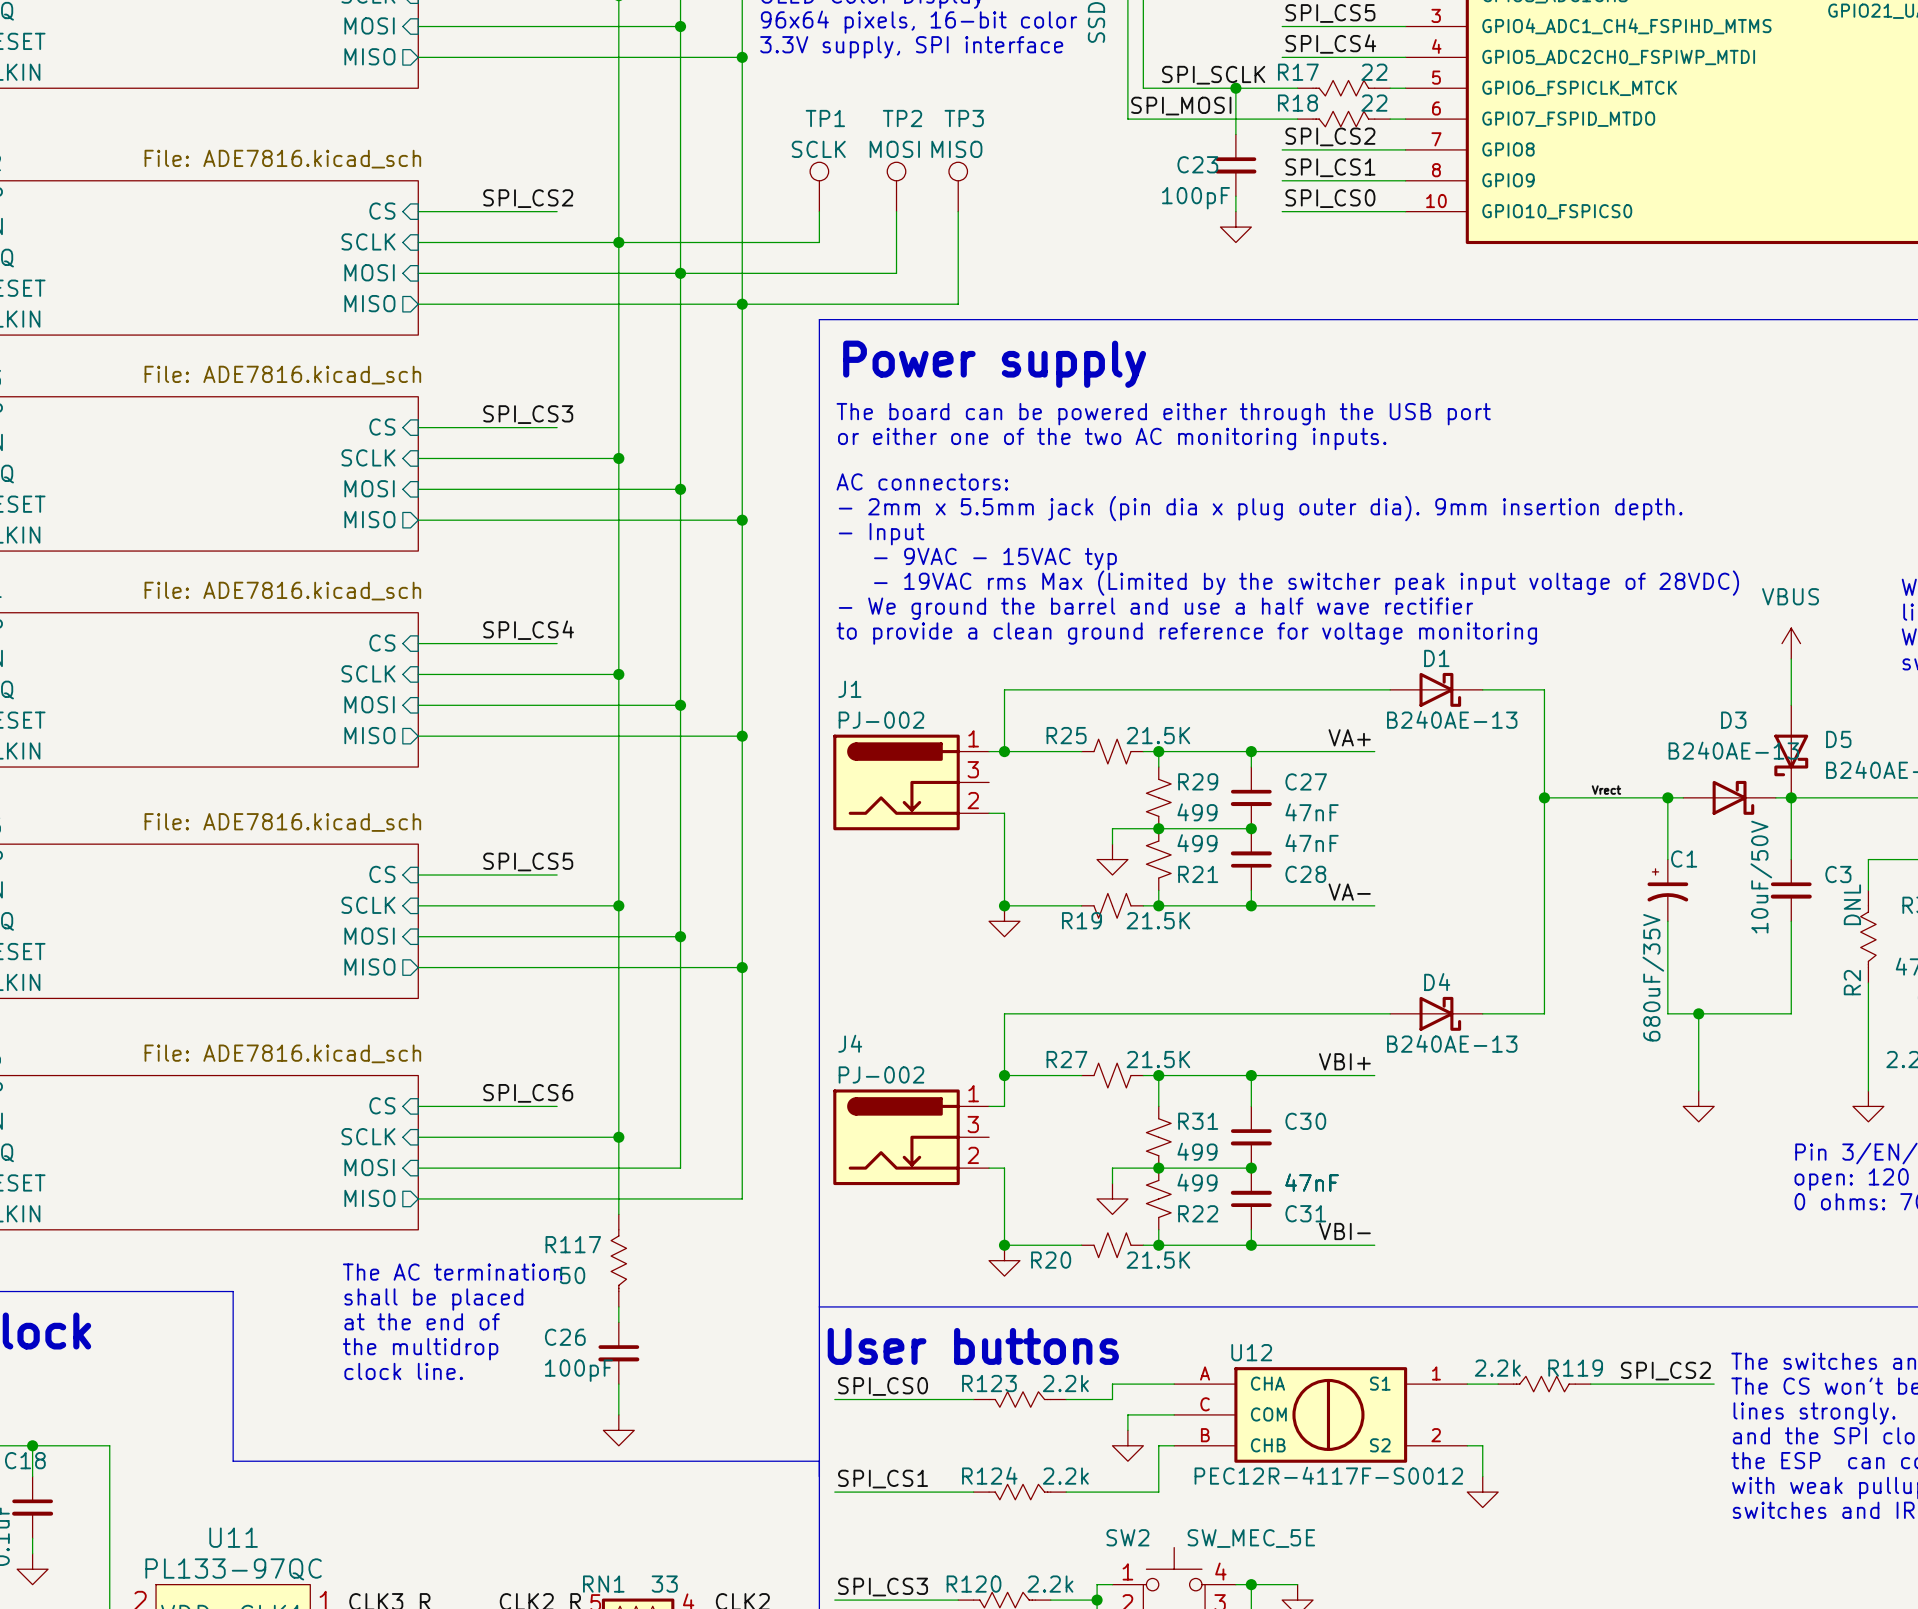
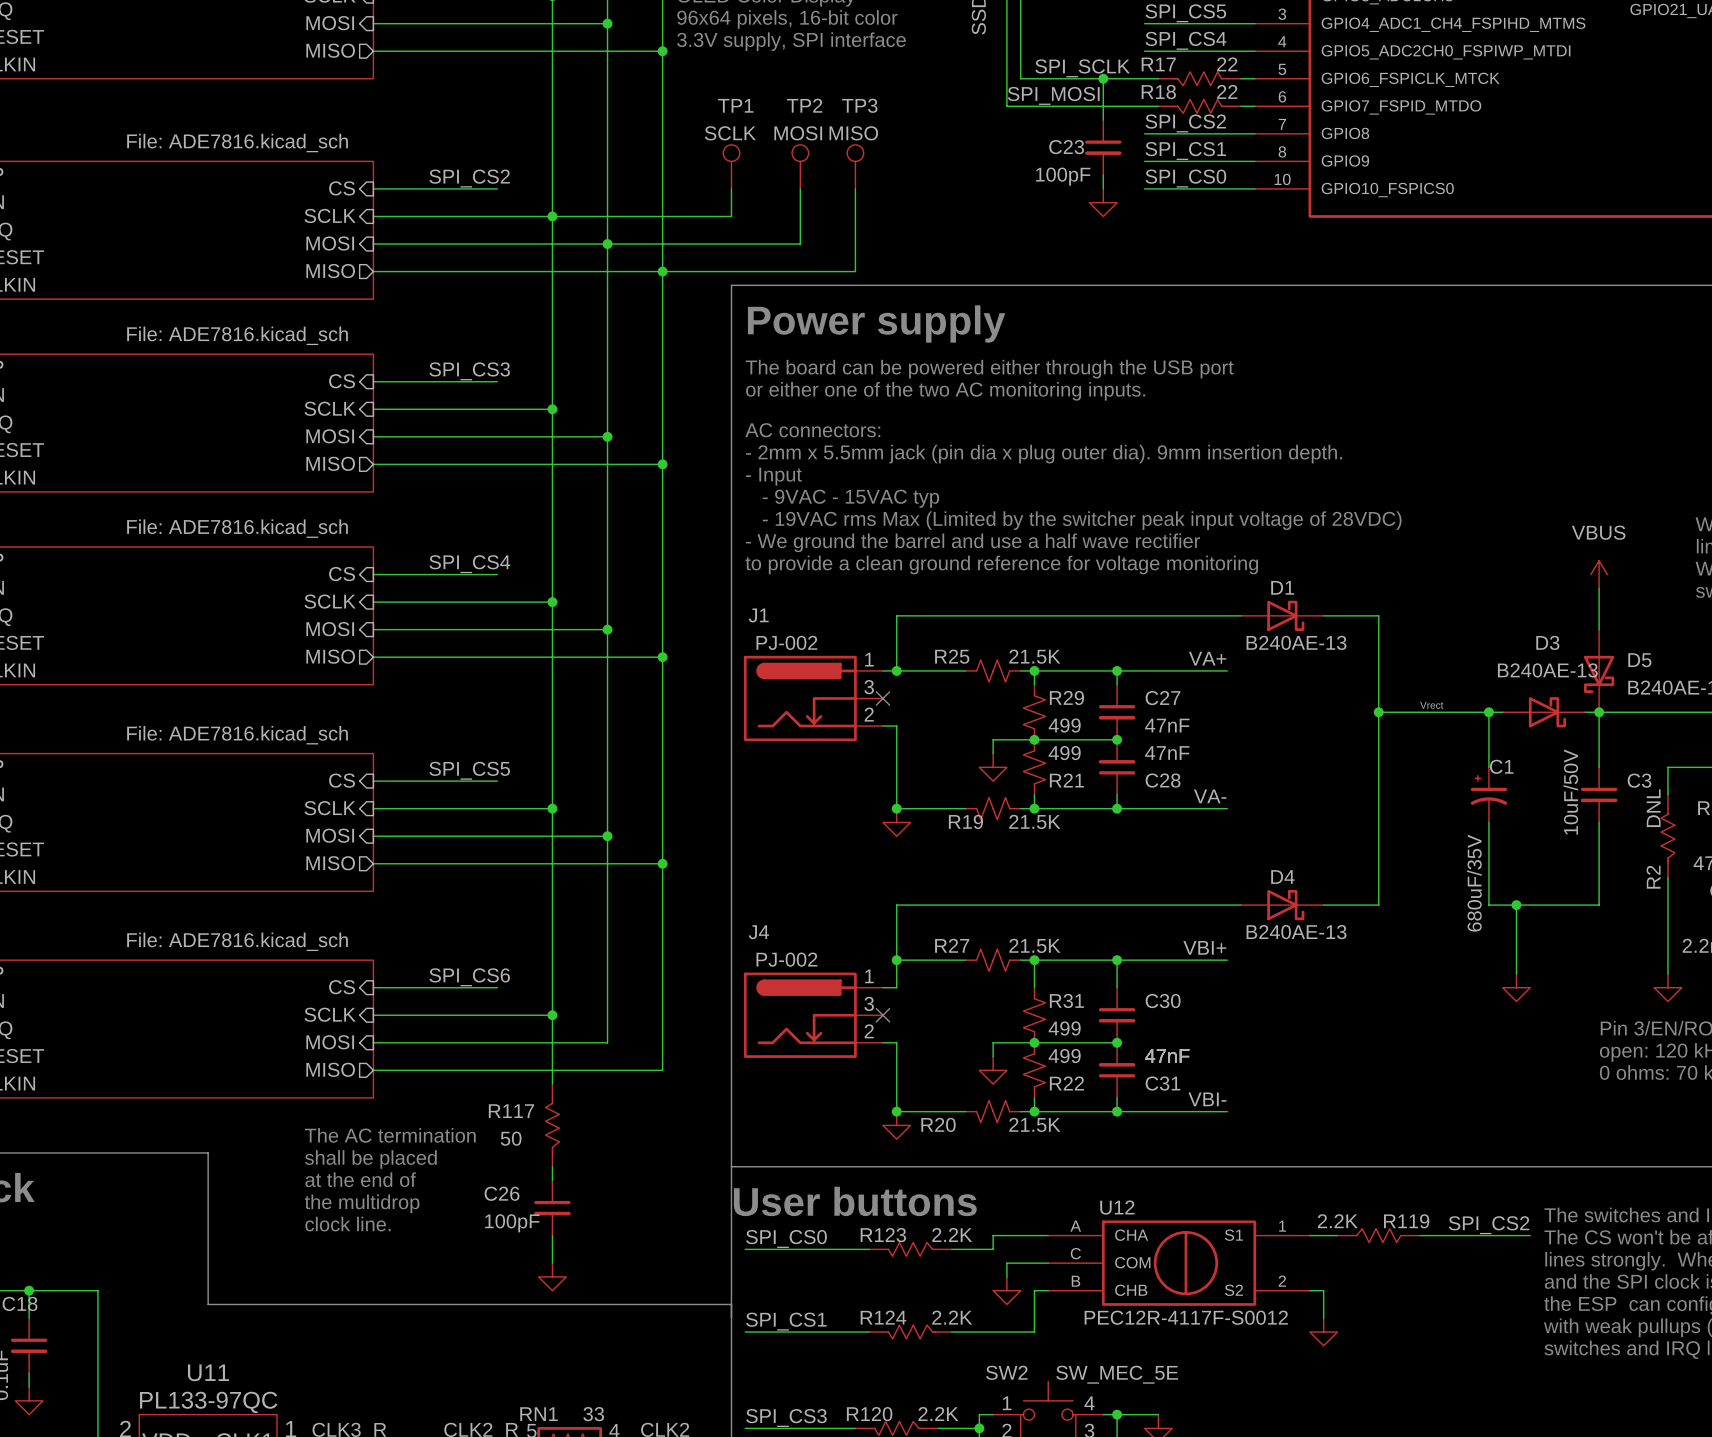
no-connect mark: none -> (882, 698)
no-connect mark: none -> (882, 1015)
R119 value: 2.2k (1497, 1368) -> 2.2K (1337, 1221)
R123 value: 2.2k (1065, 1383) -> 2.2K (952, 1234)
R124 value: 2.2k (1065, 1476) -> 2.2K (952, 1317)
R120 value: 2.2k (1050, 1584) -> 2.2K (938, 1414)

